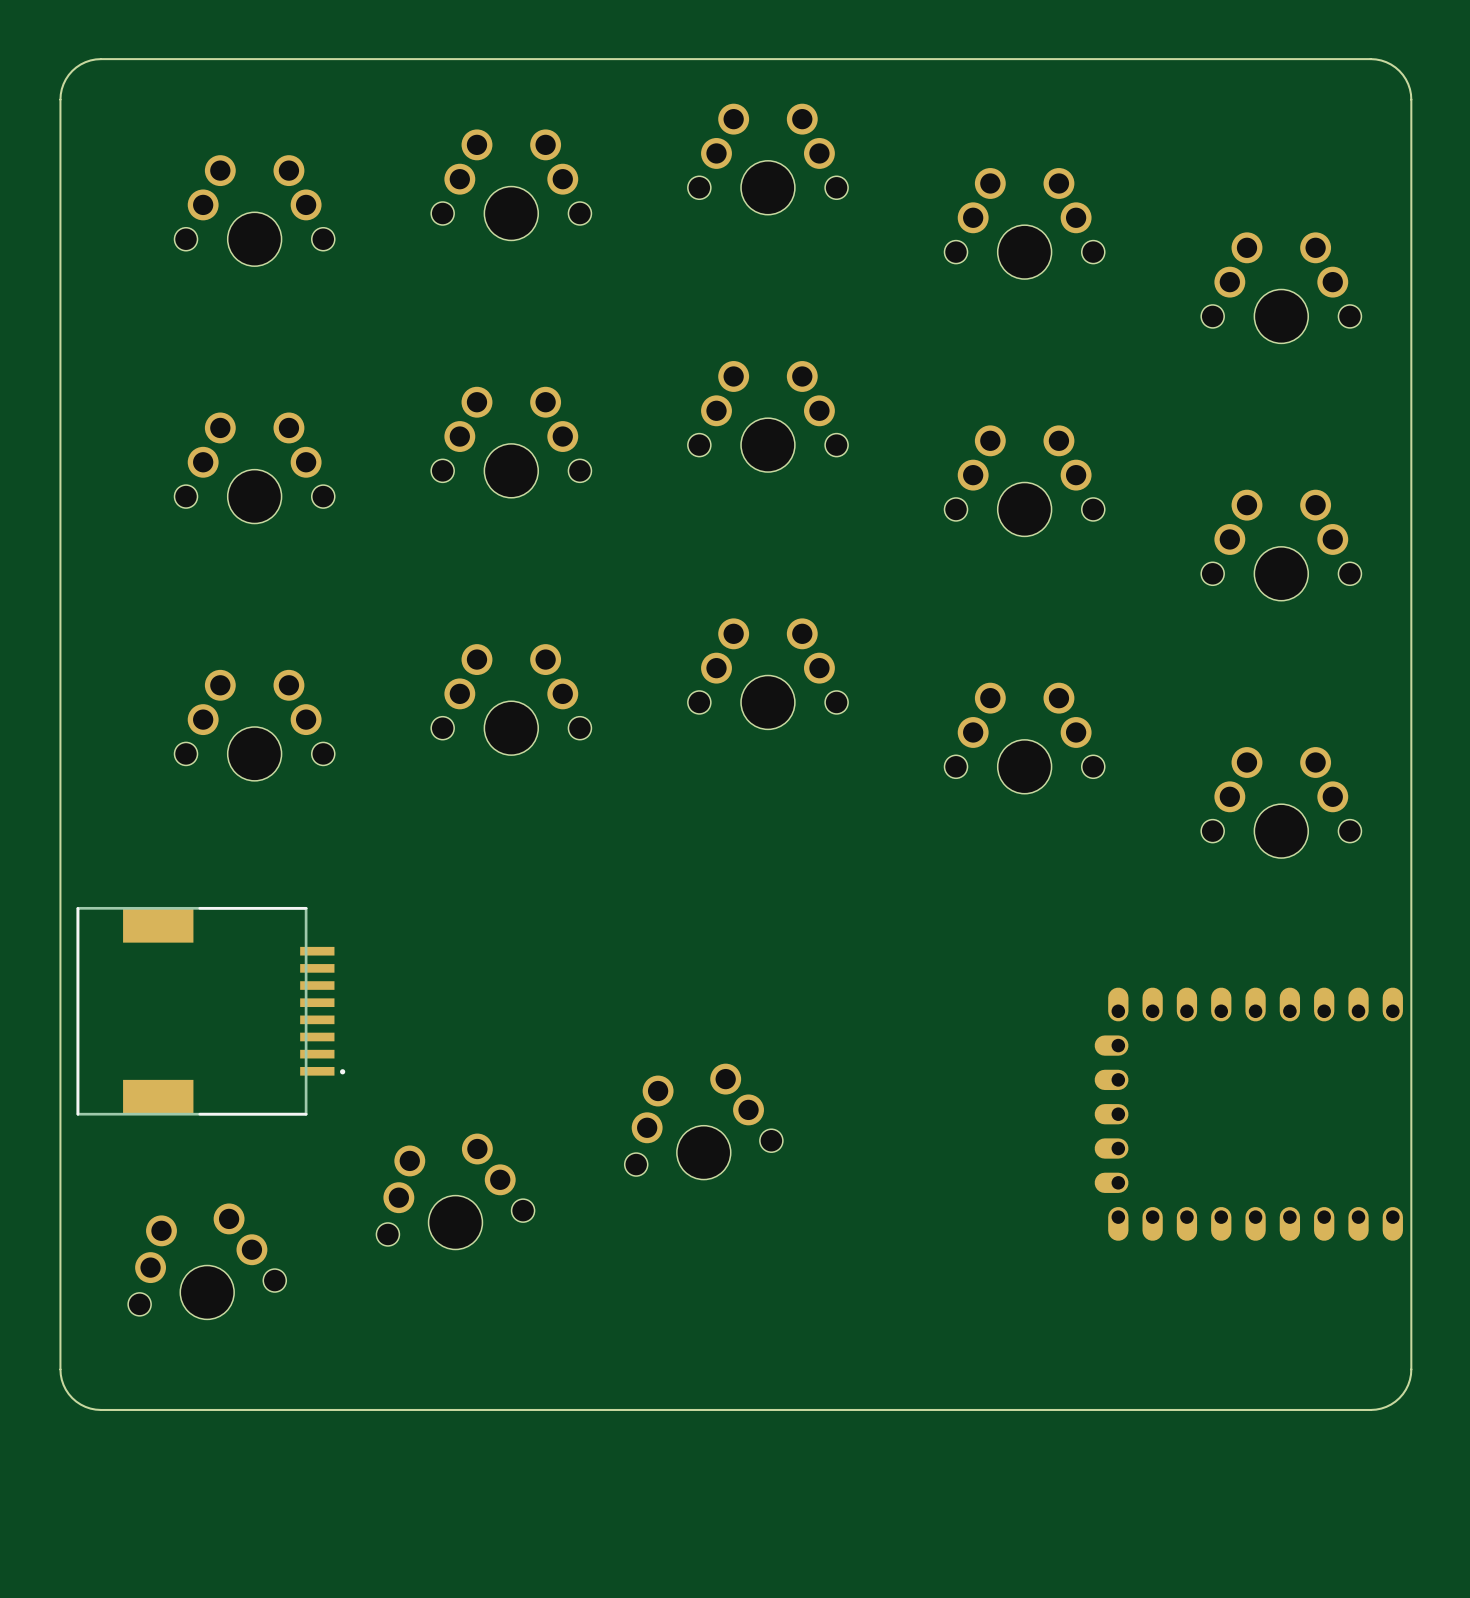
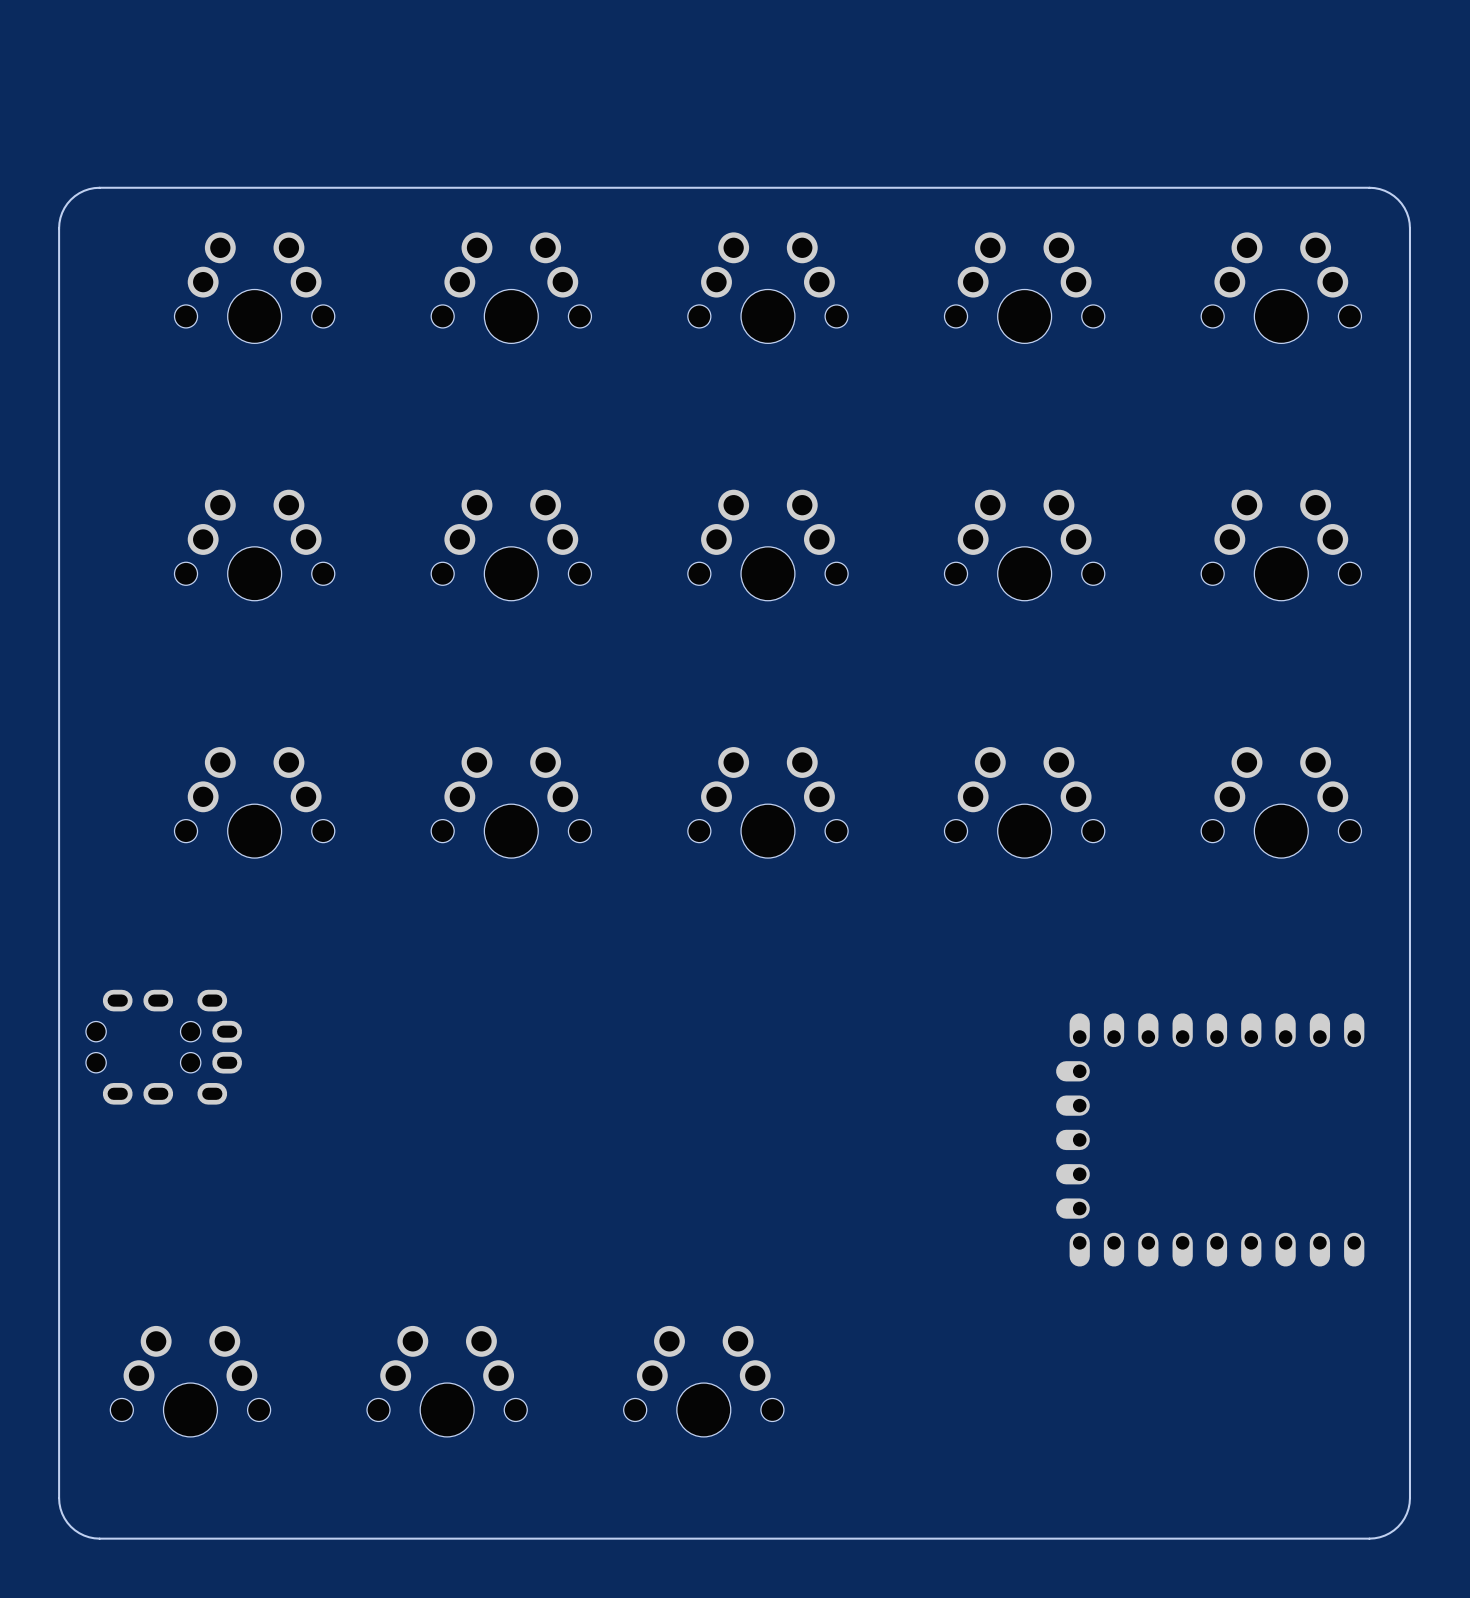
board edge: (1370, 59) (100, 59) (85, 62) (72, 70) (63, 84) (60, 99) (60, 1369) (63, 1384) (72, 1398) (85, 1406) (100, 1409) (1370, 1409) (1386, 1406) (1399, 1398) (1408, 1384) (1411, 1369) (1411, 99) (1408, 84) (1399, 70) (1386, 62) (1370, 59) -> (1369, 187) (99, 187) (84, 190) (70, 199) (62, 212) (59, 228) (59, 1498) (62, 1513) (70, 1526) (84, 1535) (99, 1538) (1369, 1538) (1384, 1535) (1398, 1526) (1406, 1513) (1409, 1498) (1409, 228) (1406, 212) (1398, 199) (1384, 190) (1369, 187)
part: (767, 159) -> none
part: (511, 184) -> none
part position: (254, 210) -> (254, 287)
part position: (1024, 223) -> (1024, 287)
part: none -> (511, 287)
part: none -> (767, 287)
part: (767, 416) -> none
part: (511, 442) -> none
part position: (254, 468) -> (254, 545)
part position: (1024, 480) -> (1024, 545)
part: none -> (511, 545)
part: none -> (767, 545)
part: (767, 673) -> none
part: (511, 699) -> none
part position: (254, 725) -> (254, 802)
part position: (1024, 738) -> (1024, 802)
part: none -> (511, 802)
part: none -> (767, 802)
part: (210, 1011) -> none
part: none -> (163, 1047)
part position: (1248, 1114) -> (1210, 1139)
part: (703, 1121) -> none
part: (455, 1191) -> none
part: (207, 1261) -> none
part: none -> (190, 1381)
part: none -> (447, 1381)
part: none -> (703, 1381)

